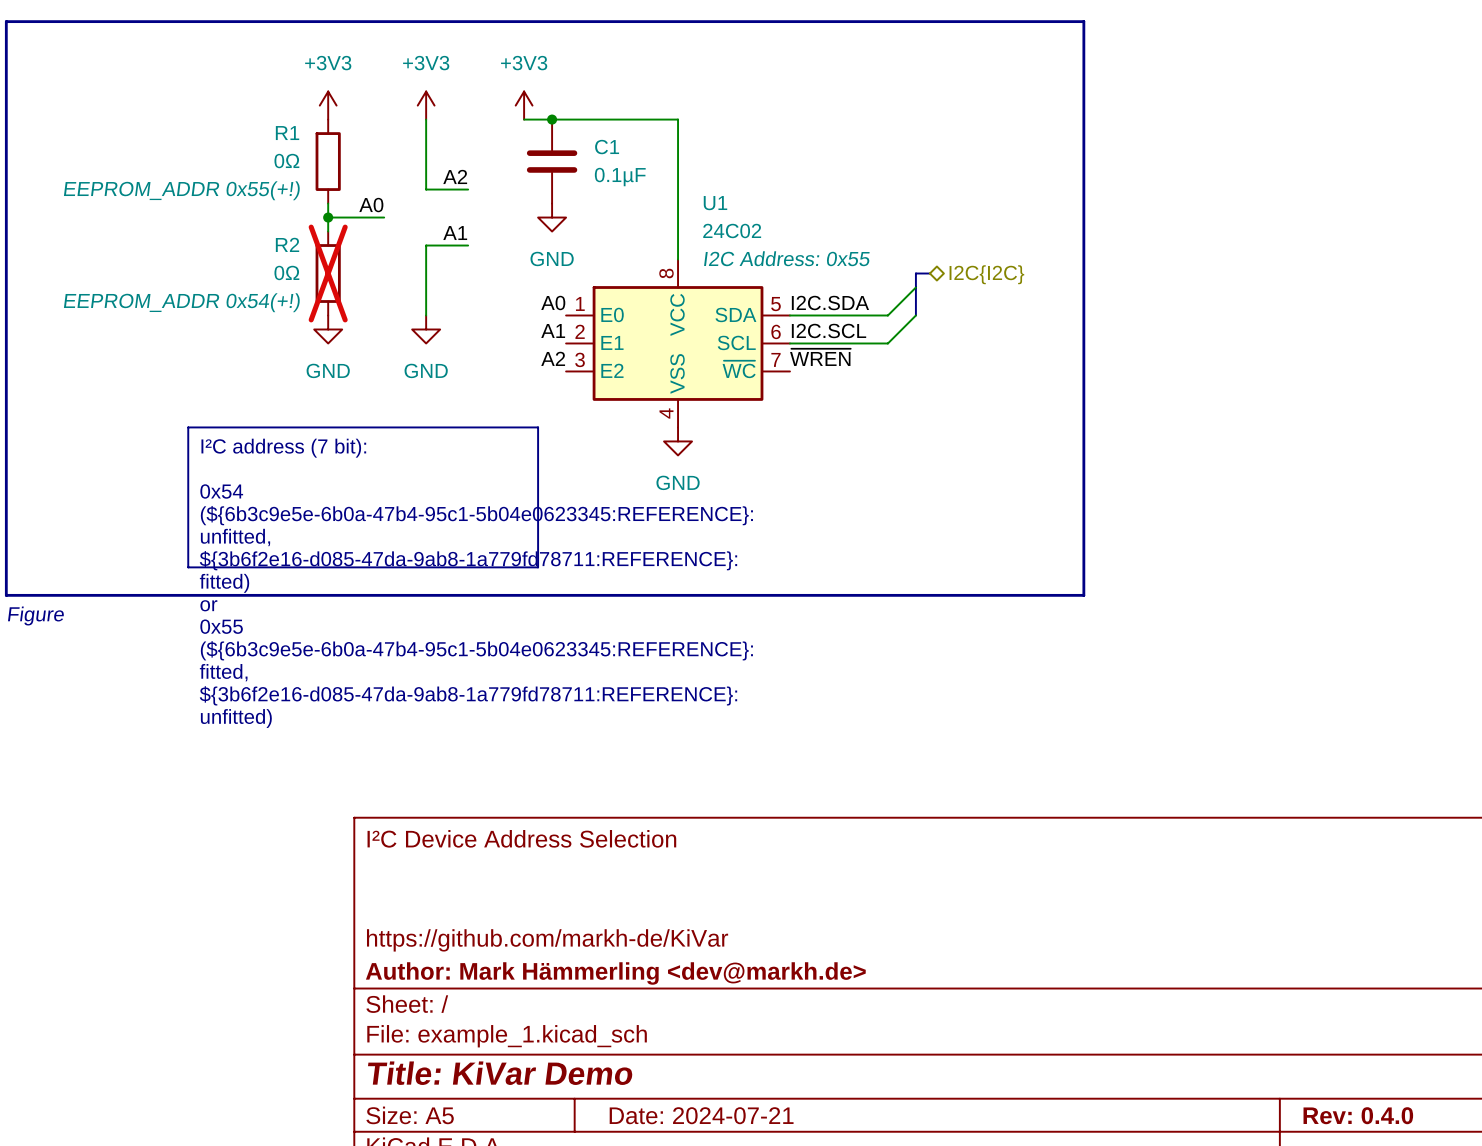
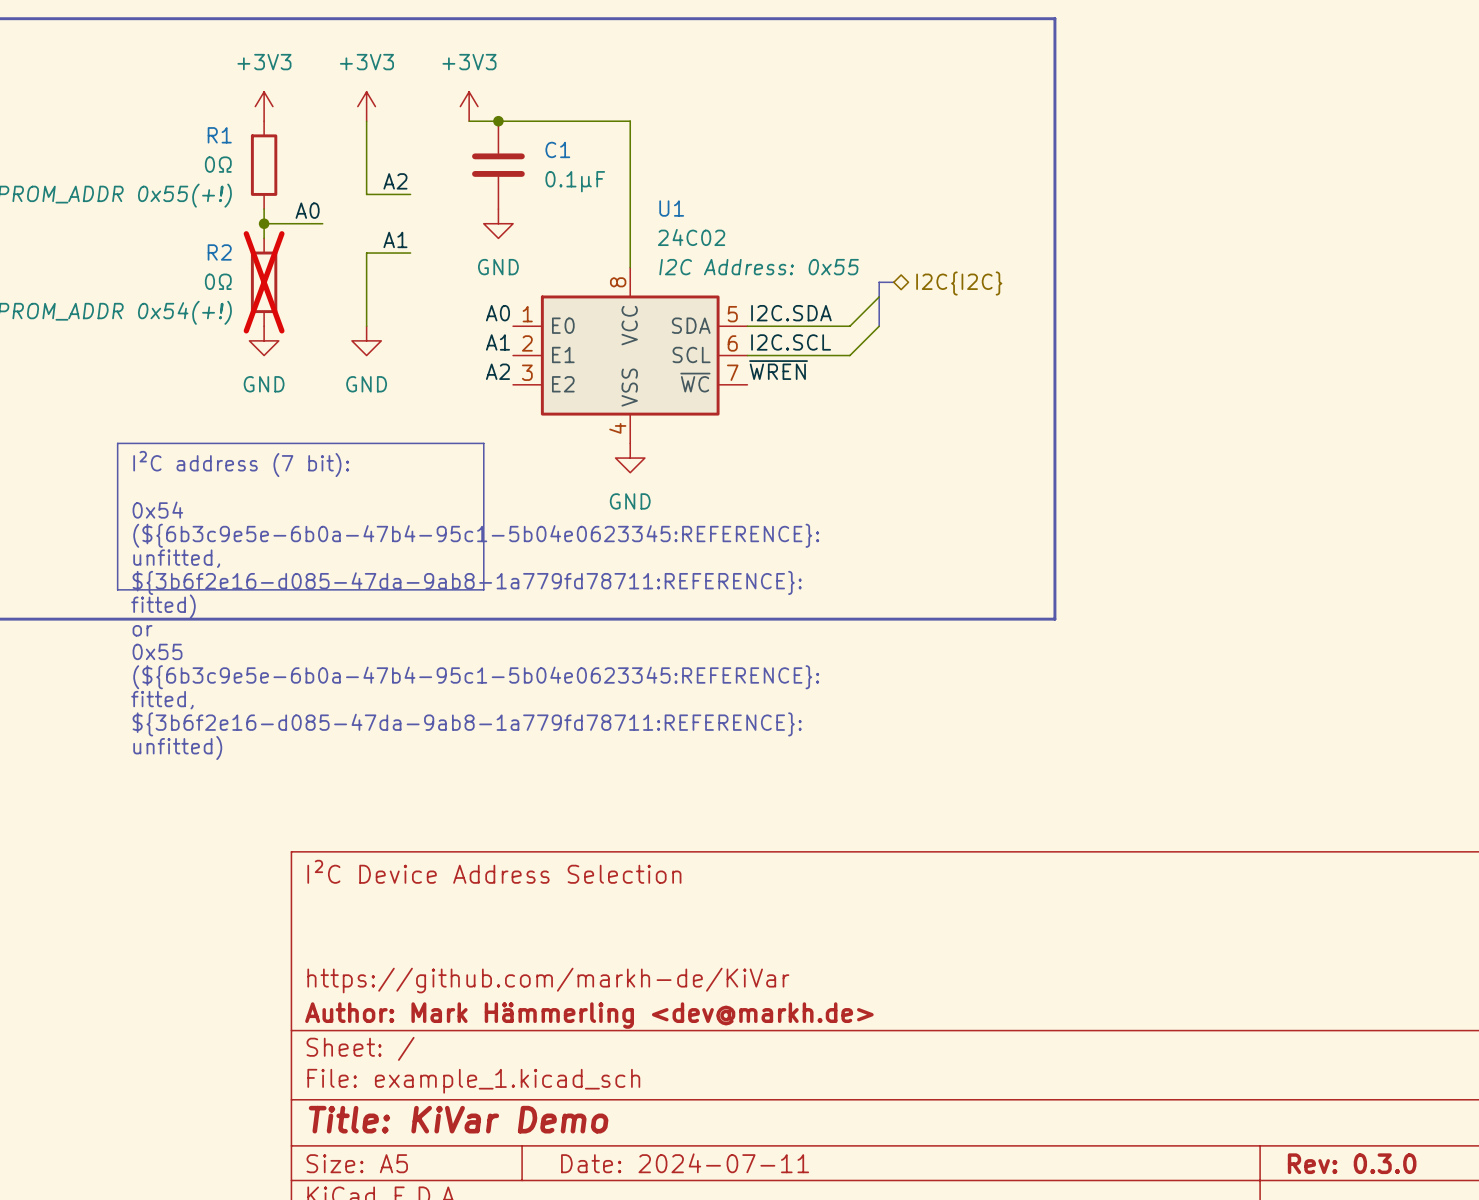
title block: Date: 2024-07-21 (701, 1115) -> Date: 2024-07-11 (685, 1163)
title block: Rev: 0.4.0 (1358, 1115) -> Rev: 0.3.0 (1352, 1163)

